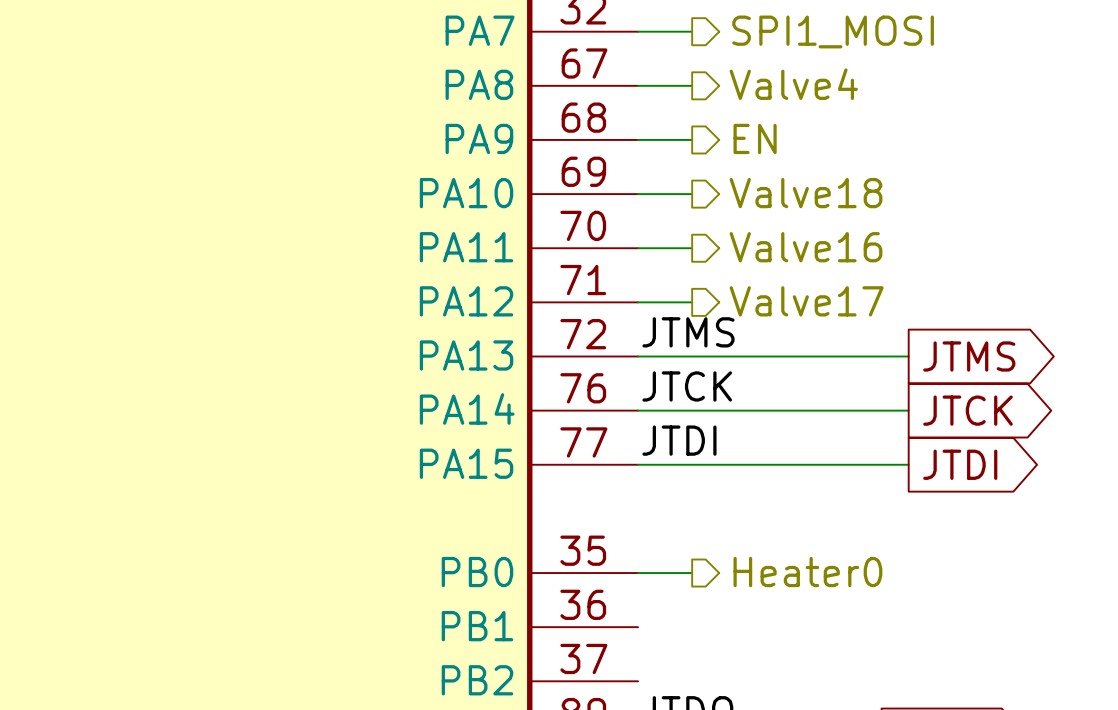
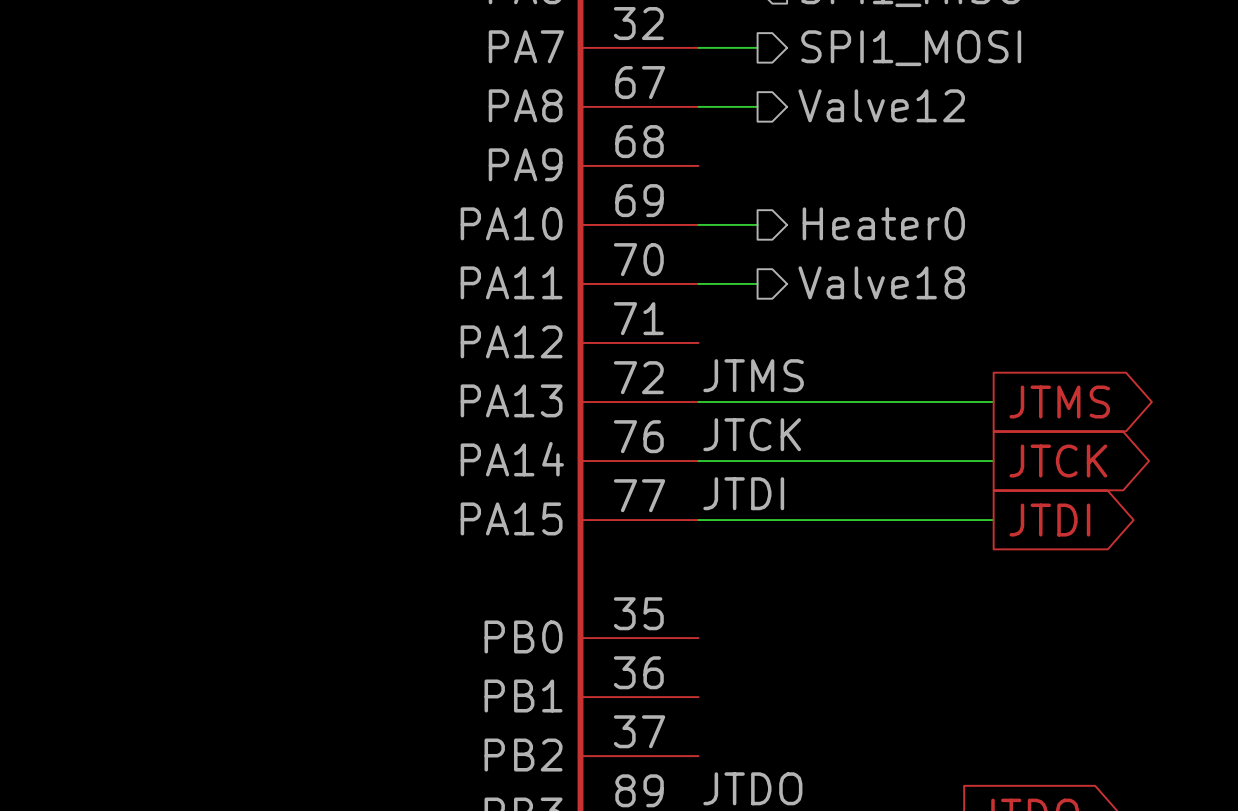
hierarchical label: Valve4 (793, 84) -> Valve12 (881, 105)
hierarchical label: EN (755, 138) -> none
wire: (638, 139) (692, 139) -> none
hierarchical label: Valve18 (806, 193) -> Heater0 (883, 223)
hierarchical label: Valve16 (806, 247) -> Valve18 (881, 282)
hierarchical label: Valve17 (806, 301) -> none
wire: (638, 302) (692, 302) -> none
hierarchical label: Heater0 (807, 572) -> none
wire: (638, 573) (692, 573) -> none

